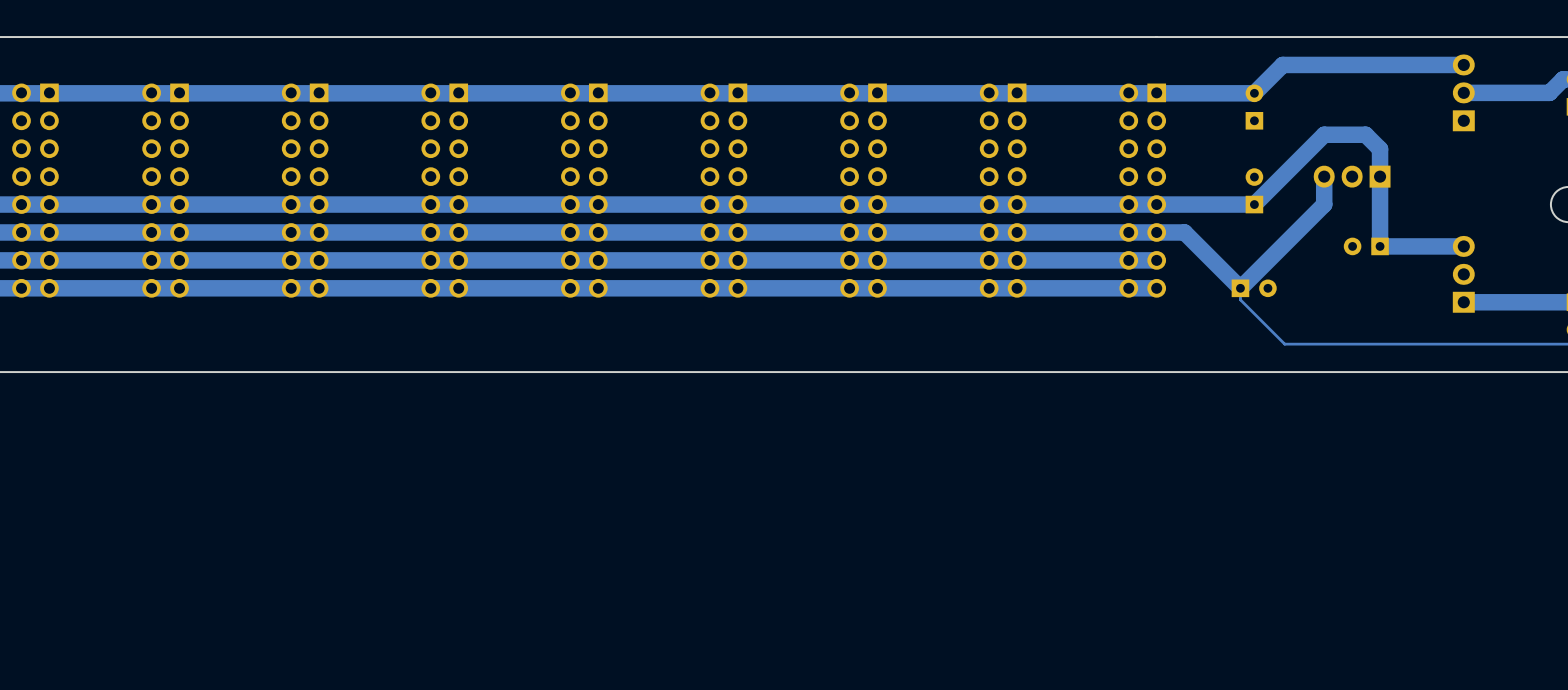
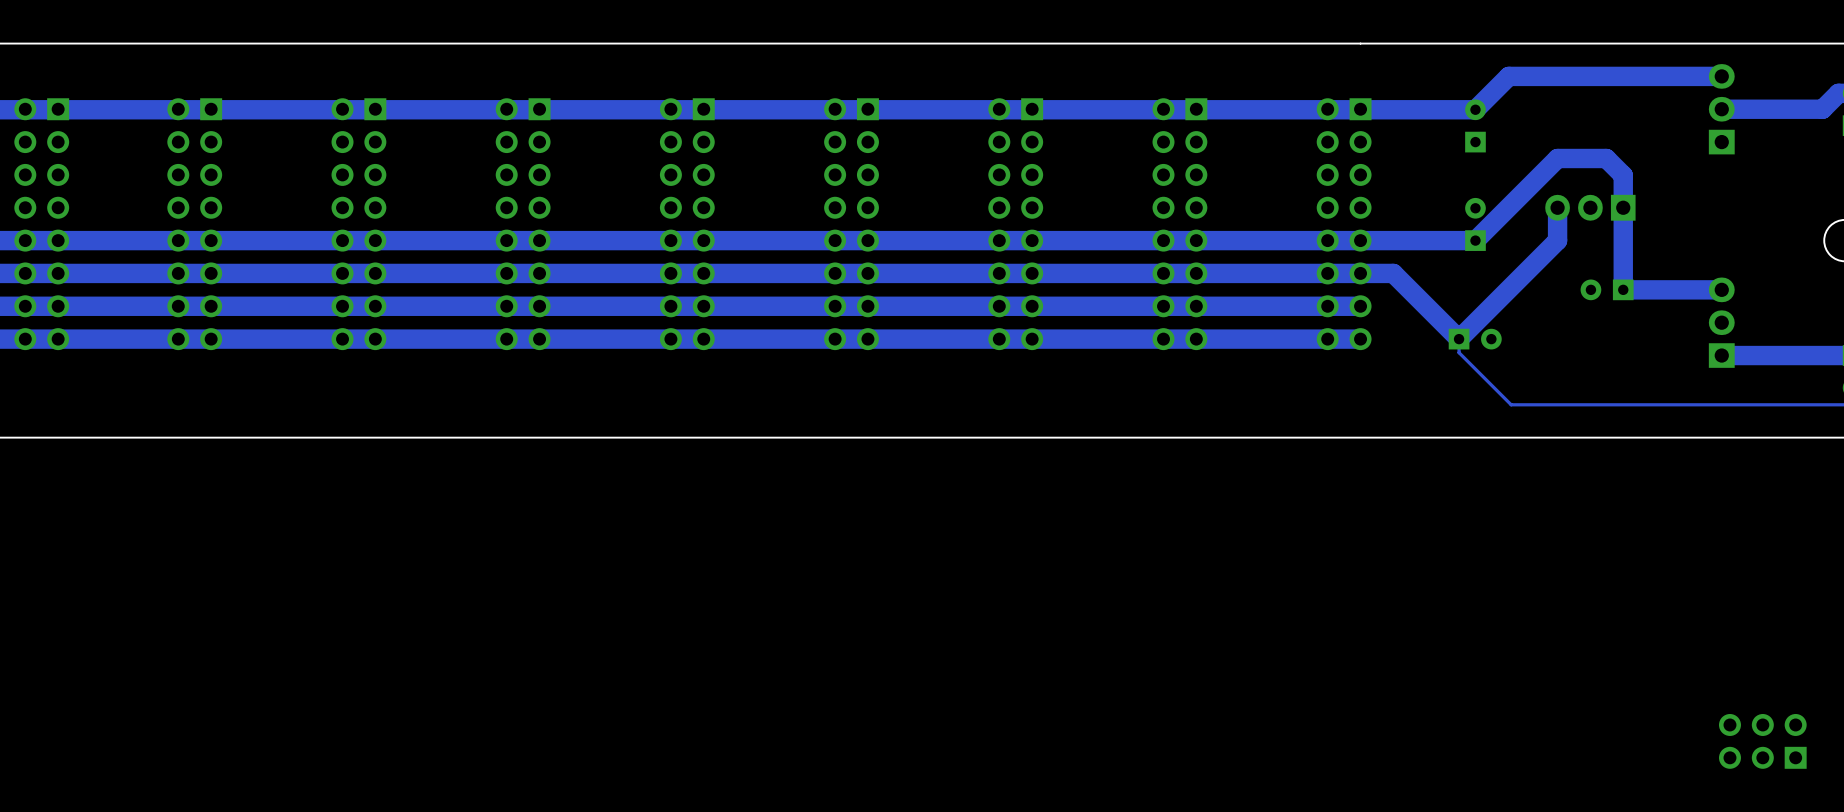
part: none -> (1762, 741)

